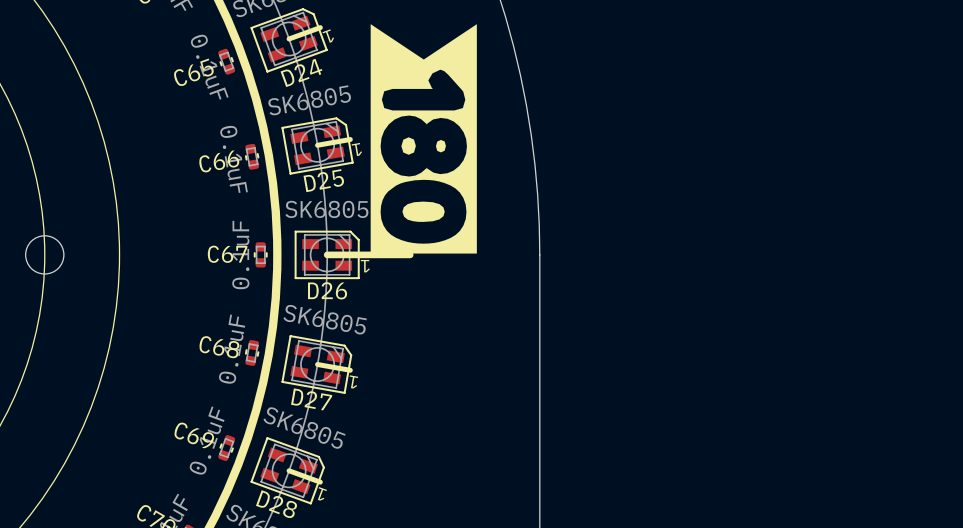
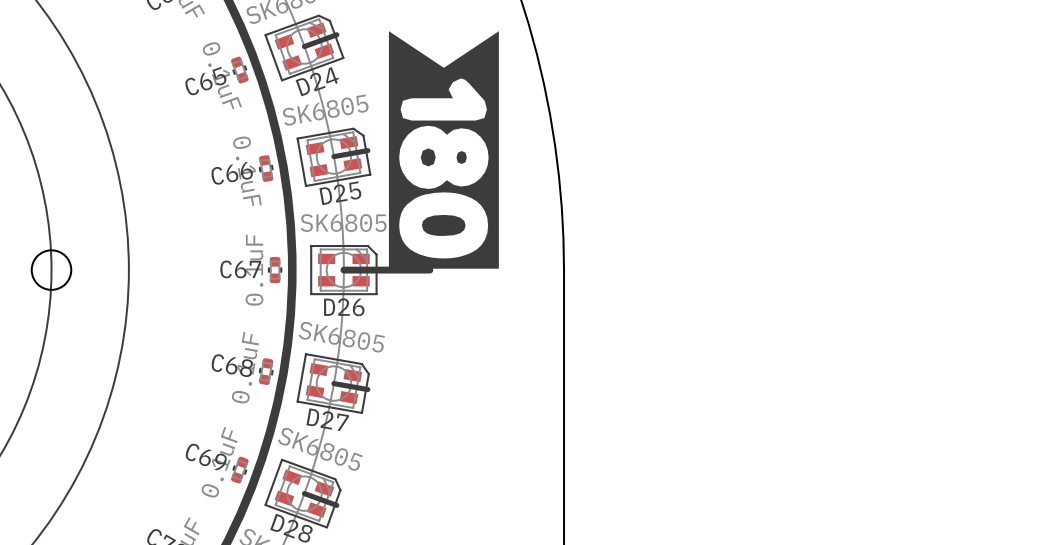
D24 text: 1 (328, 36) -> none
D25 text: 1 (356, 149) -> none
D26 text: 1 (365, 266) -> none
D27 text: 1 (353, 381) -> none
D28 text: 1 (322, 493) -> none

